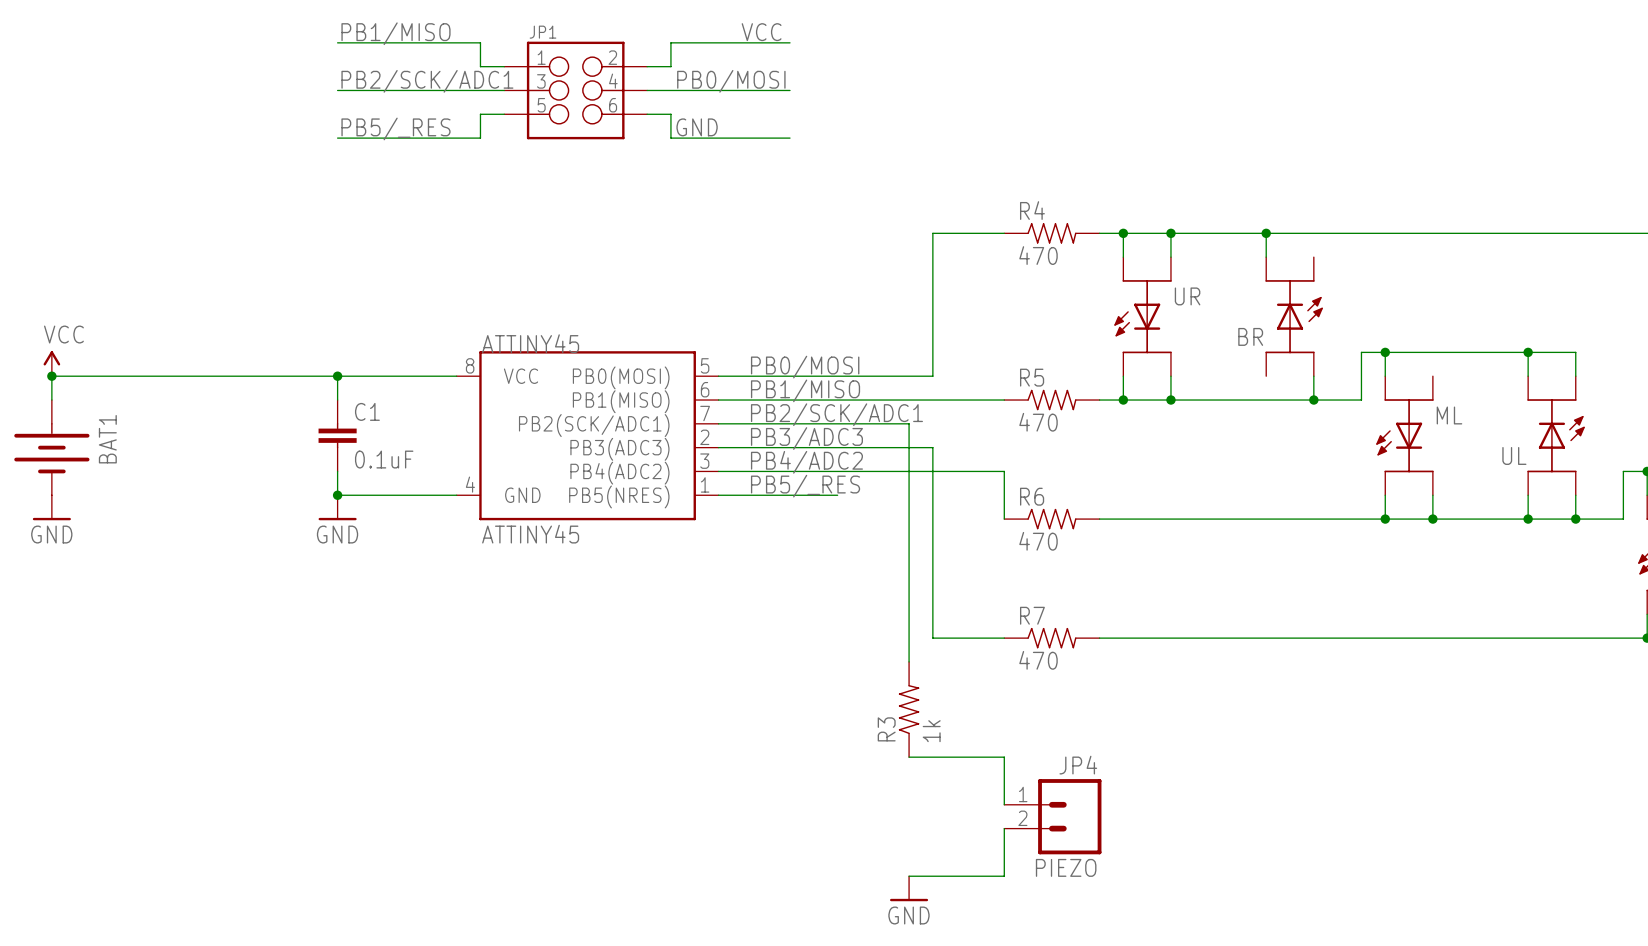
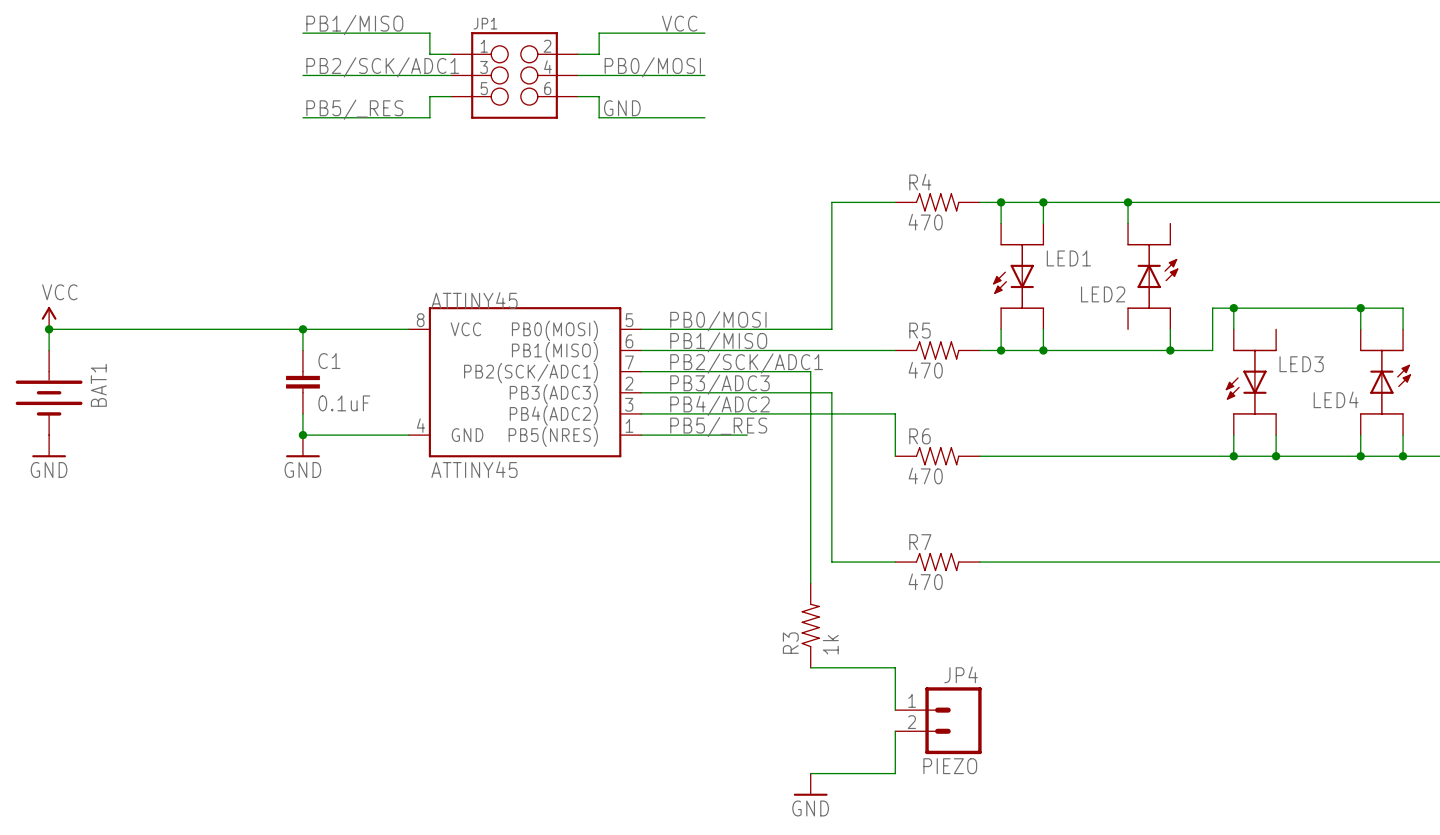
UR name: UR (1187, 296) -> LED1 (1068, 258)
BR name: BR (1250, 336) -> LED2 (1103, 294)
ML name: ML (1449, 415) -> LED3 (1301, 364)
UL name: UL (1514, 455) -> LED4 (1336, 399)

